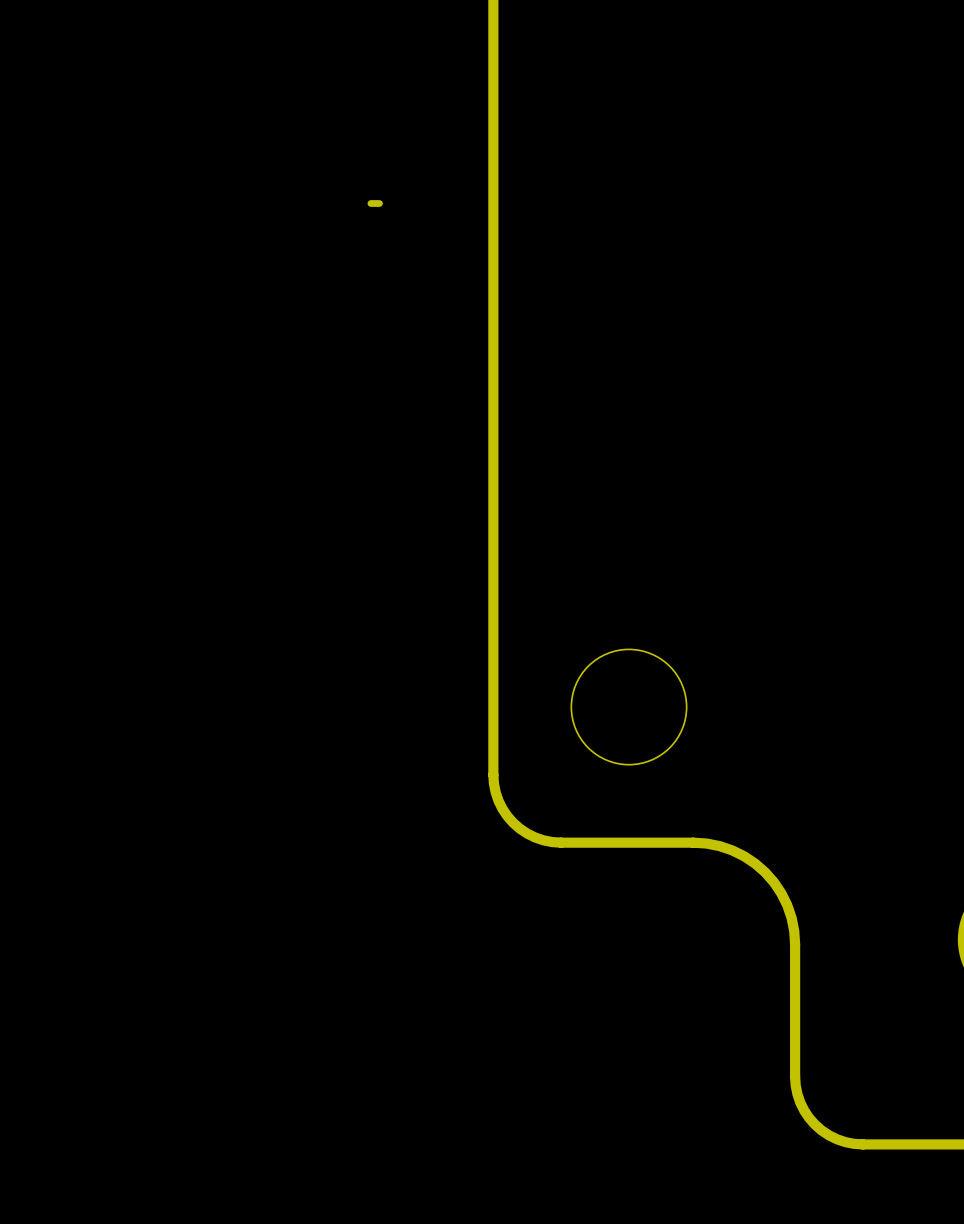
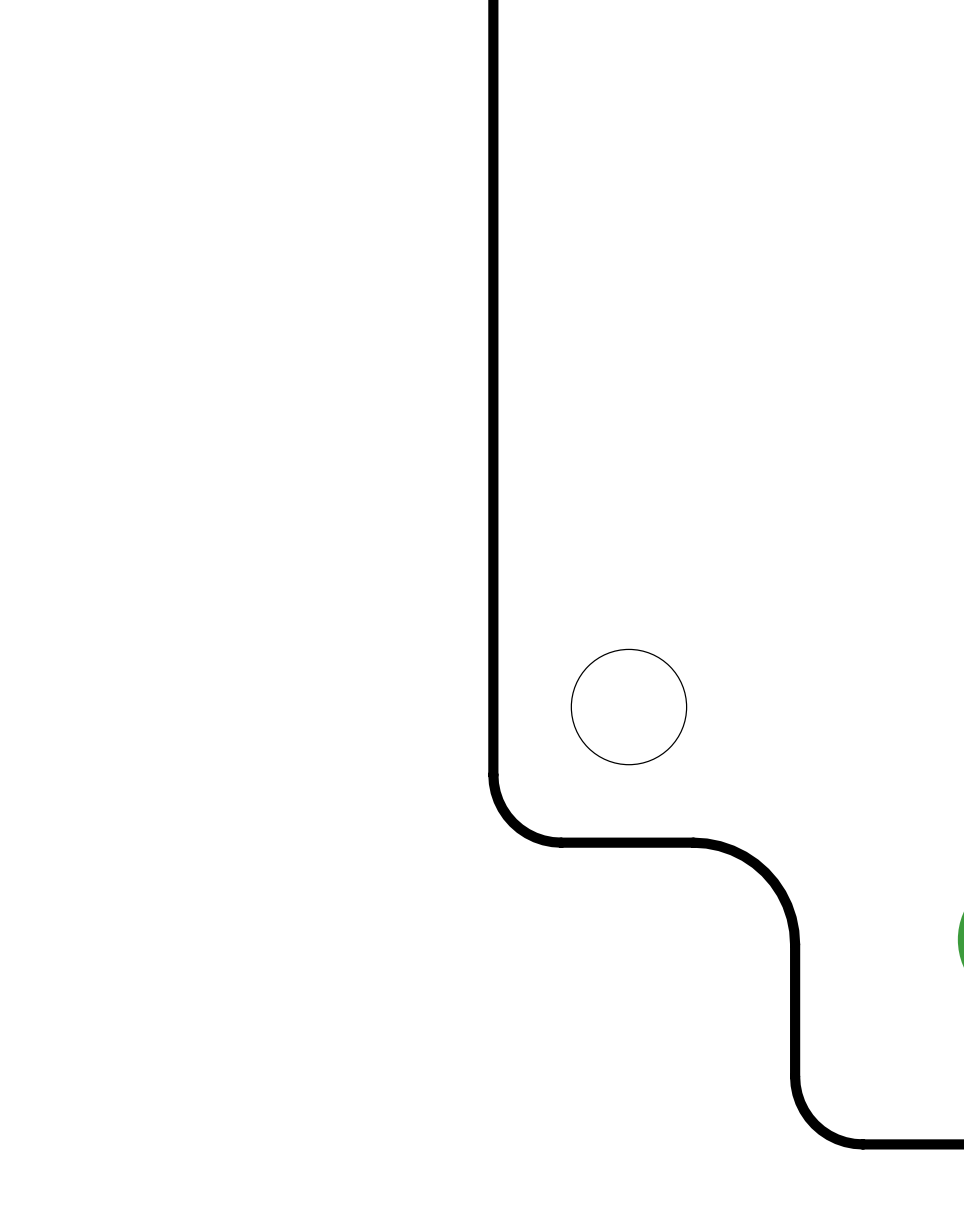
board edge: (370, 203) (379, 203) -> none

